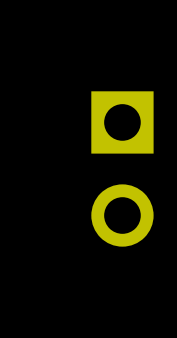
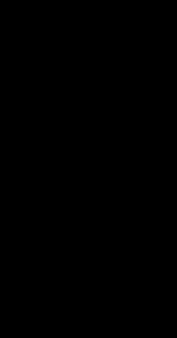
part: (122, 168) -> none

